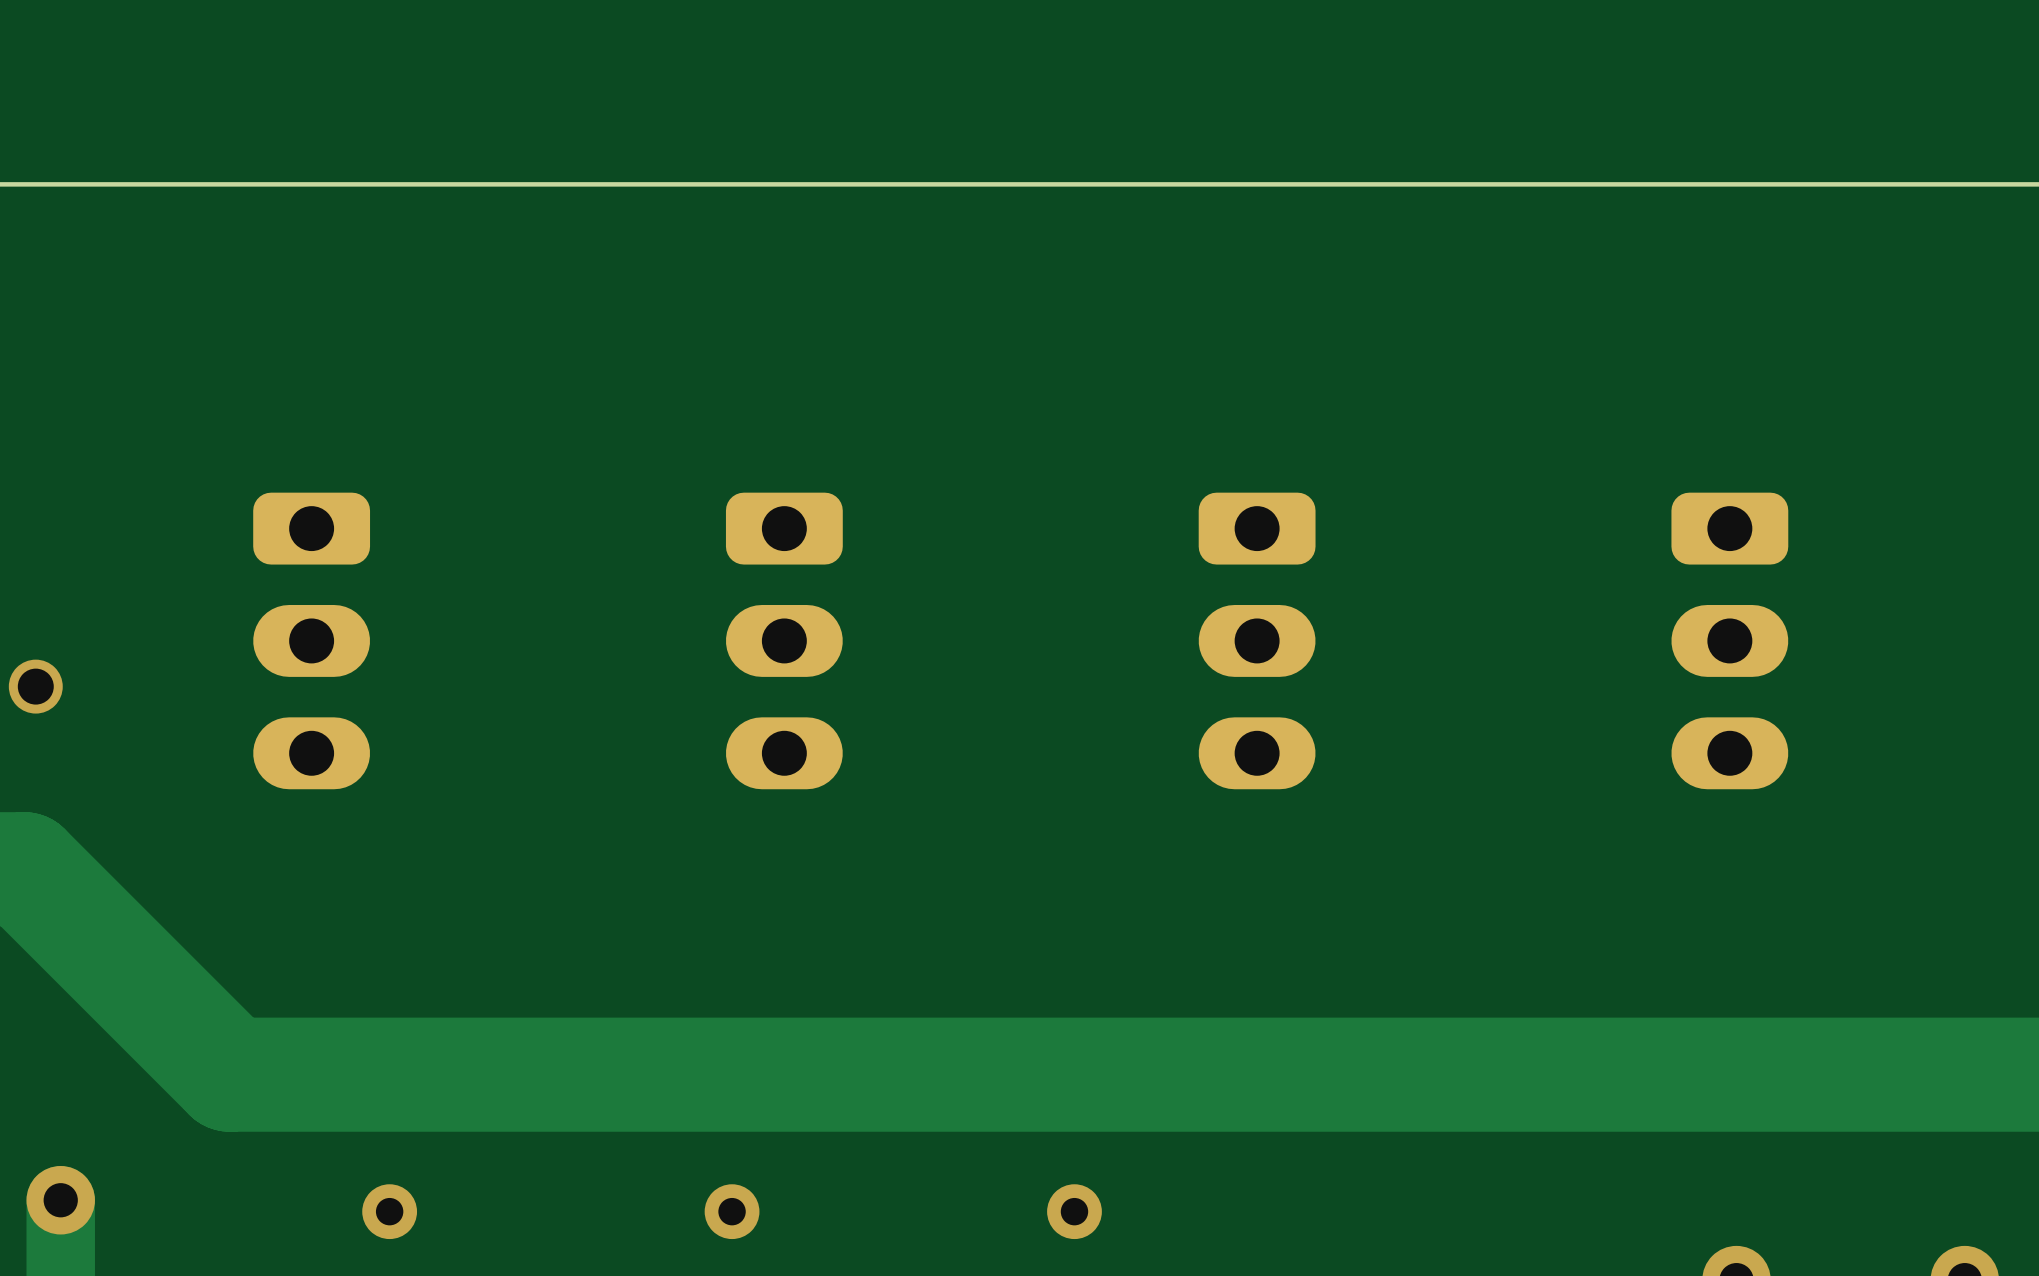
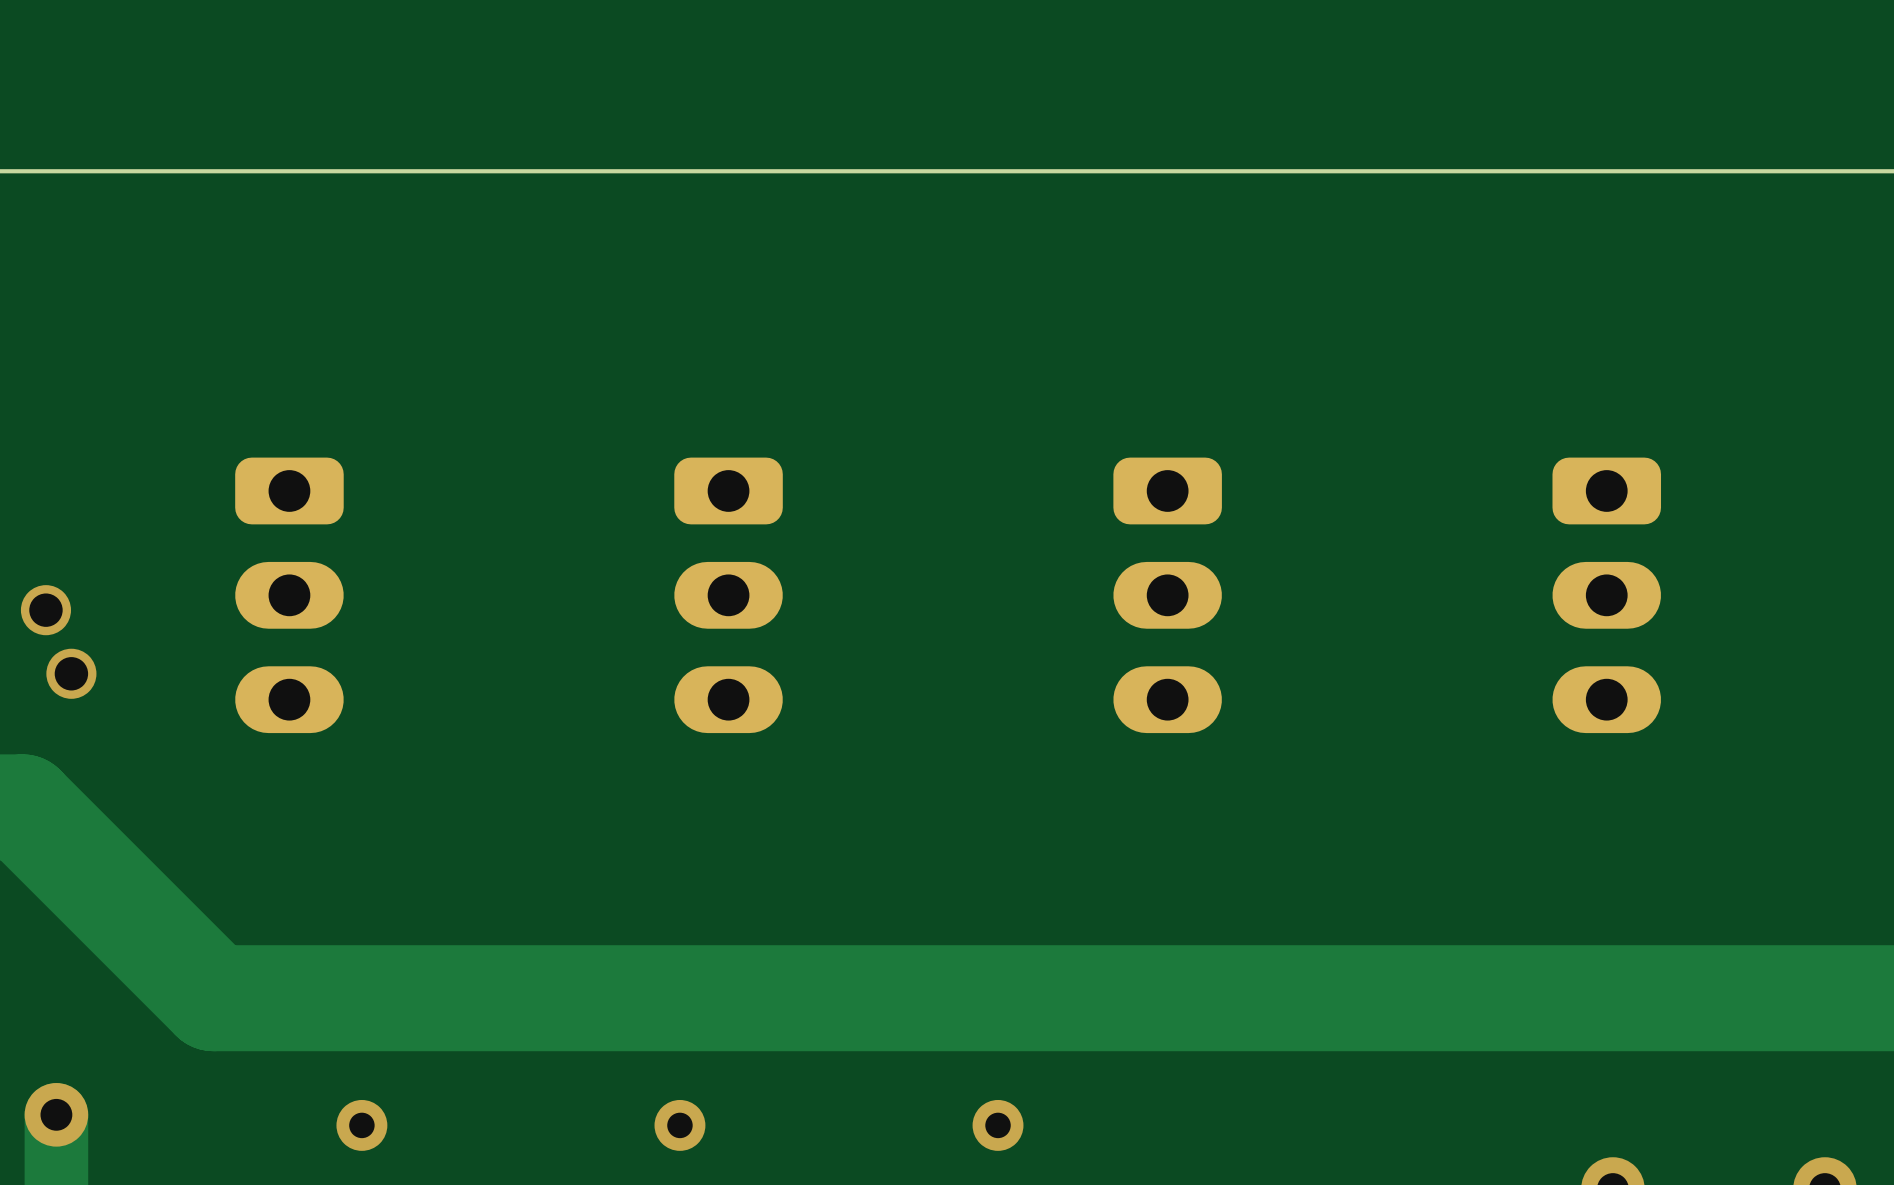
via: none -> (45, 610)
via: (35, 686) -> none
via: none -> (71, 673)

